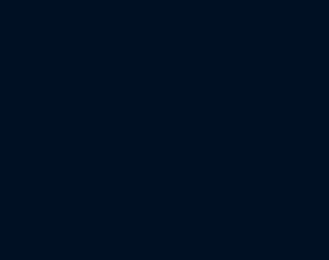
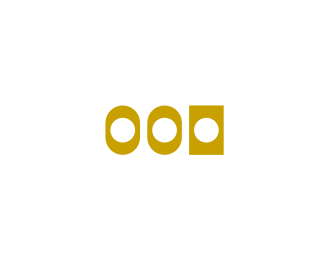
part: none -> (164, 130)

